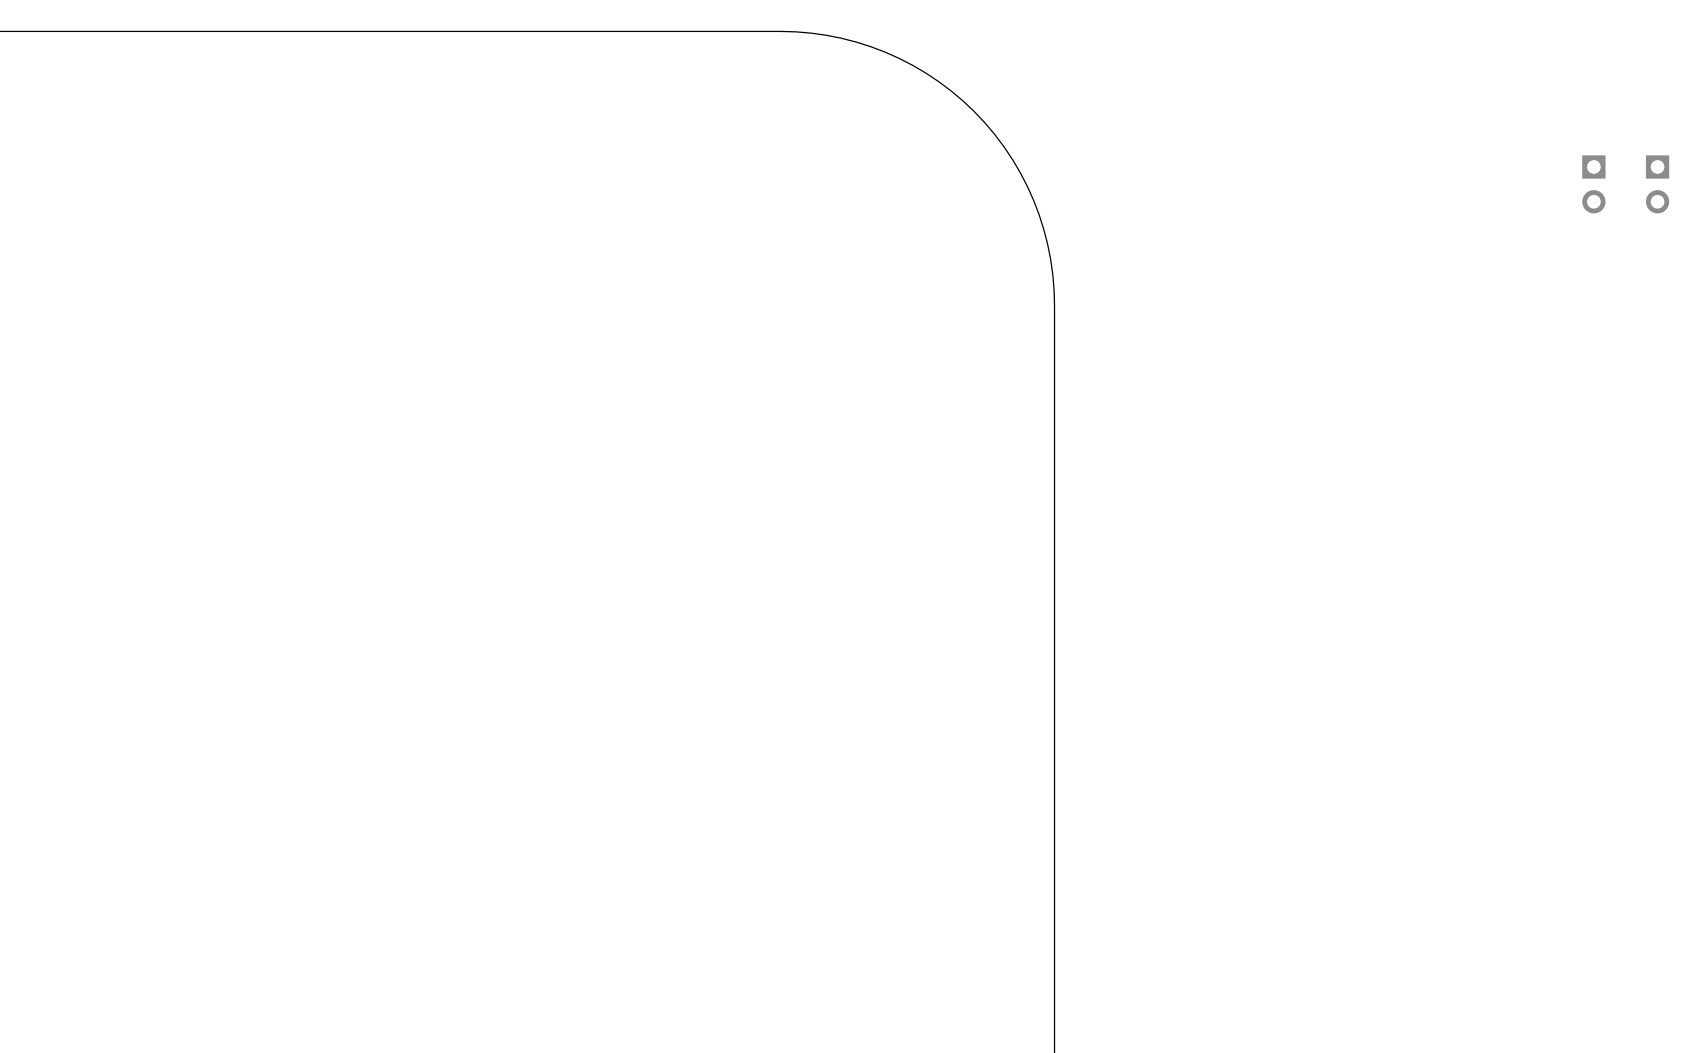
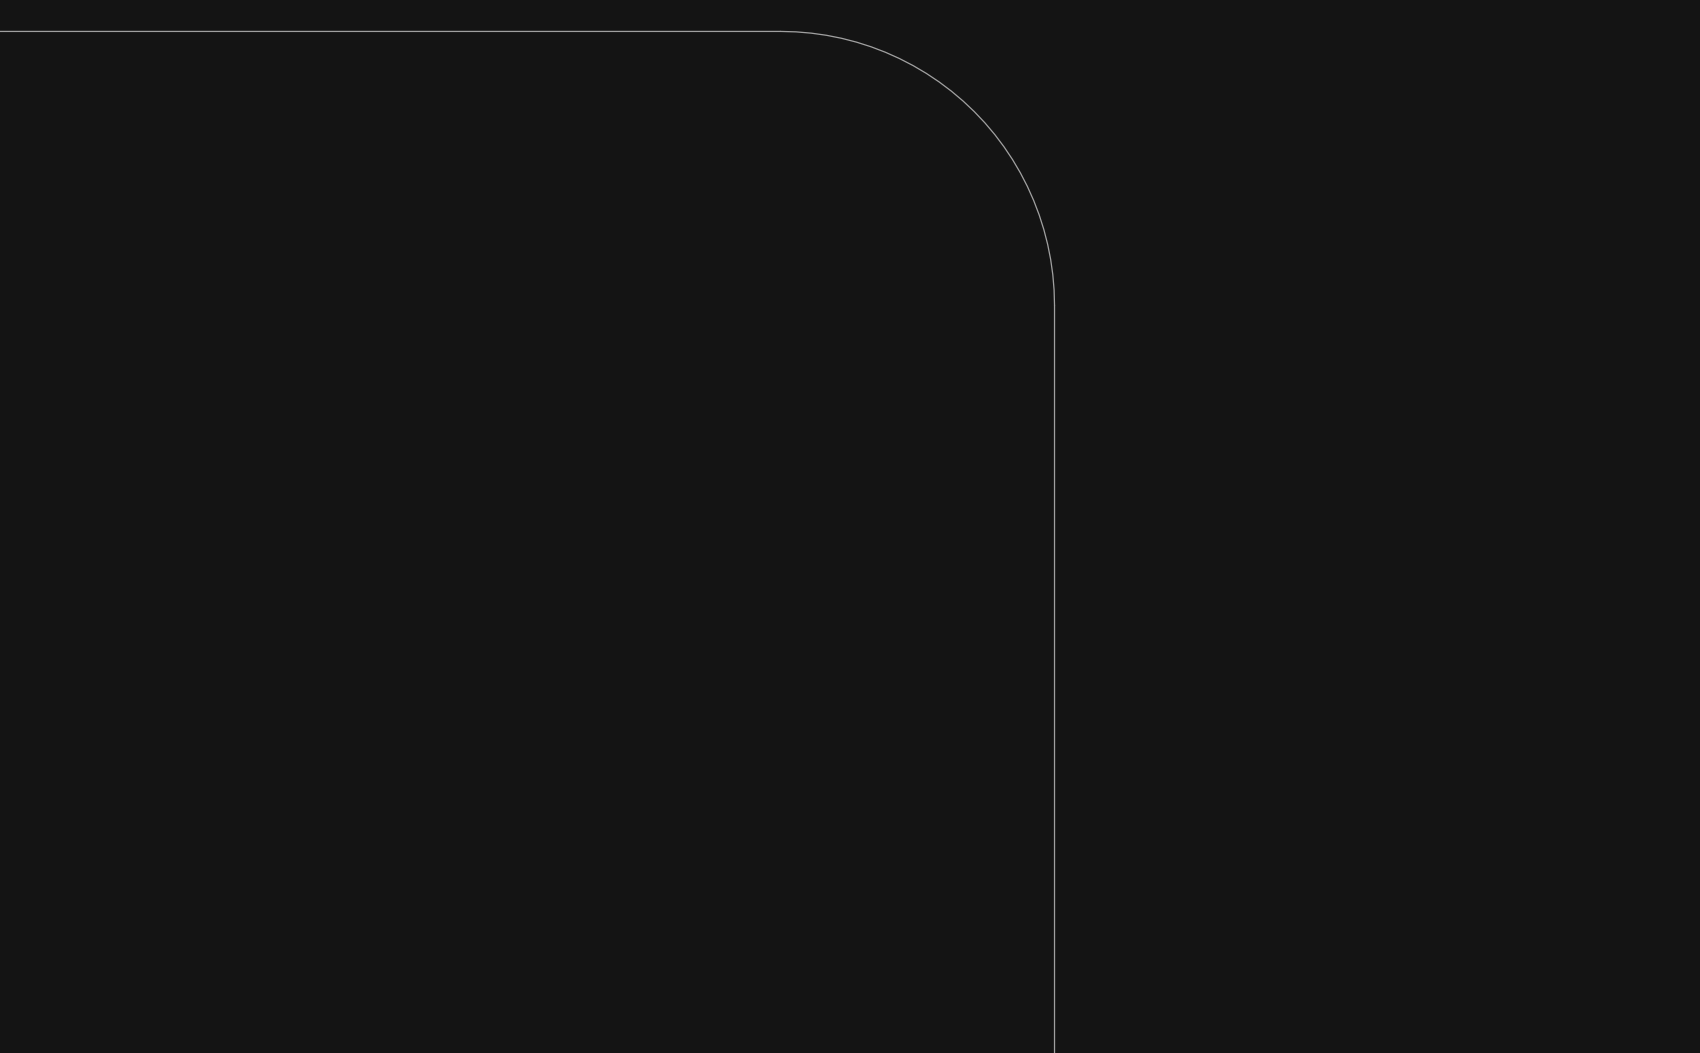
part: (1593, 184) -> none
part: (1657, 184) -> none

